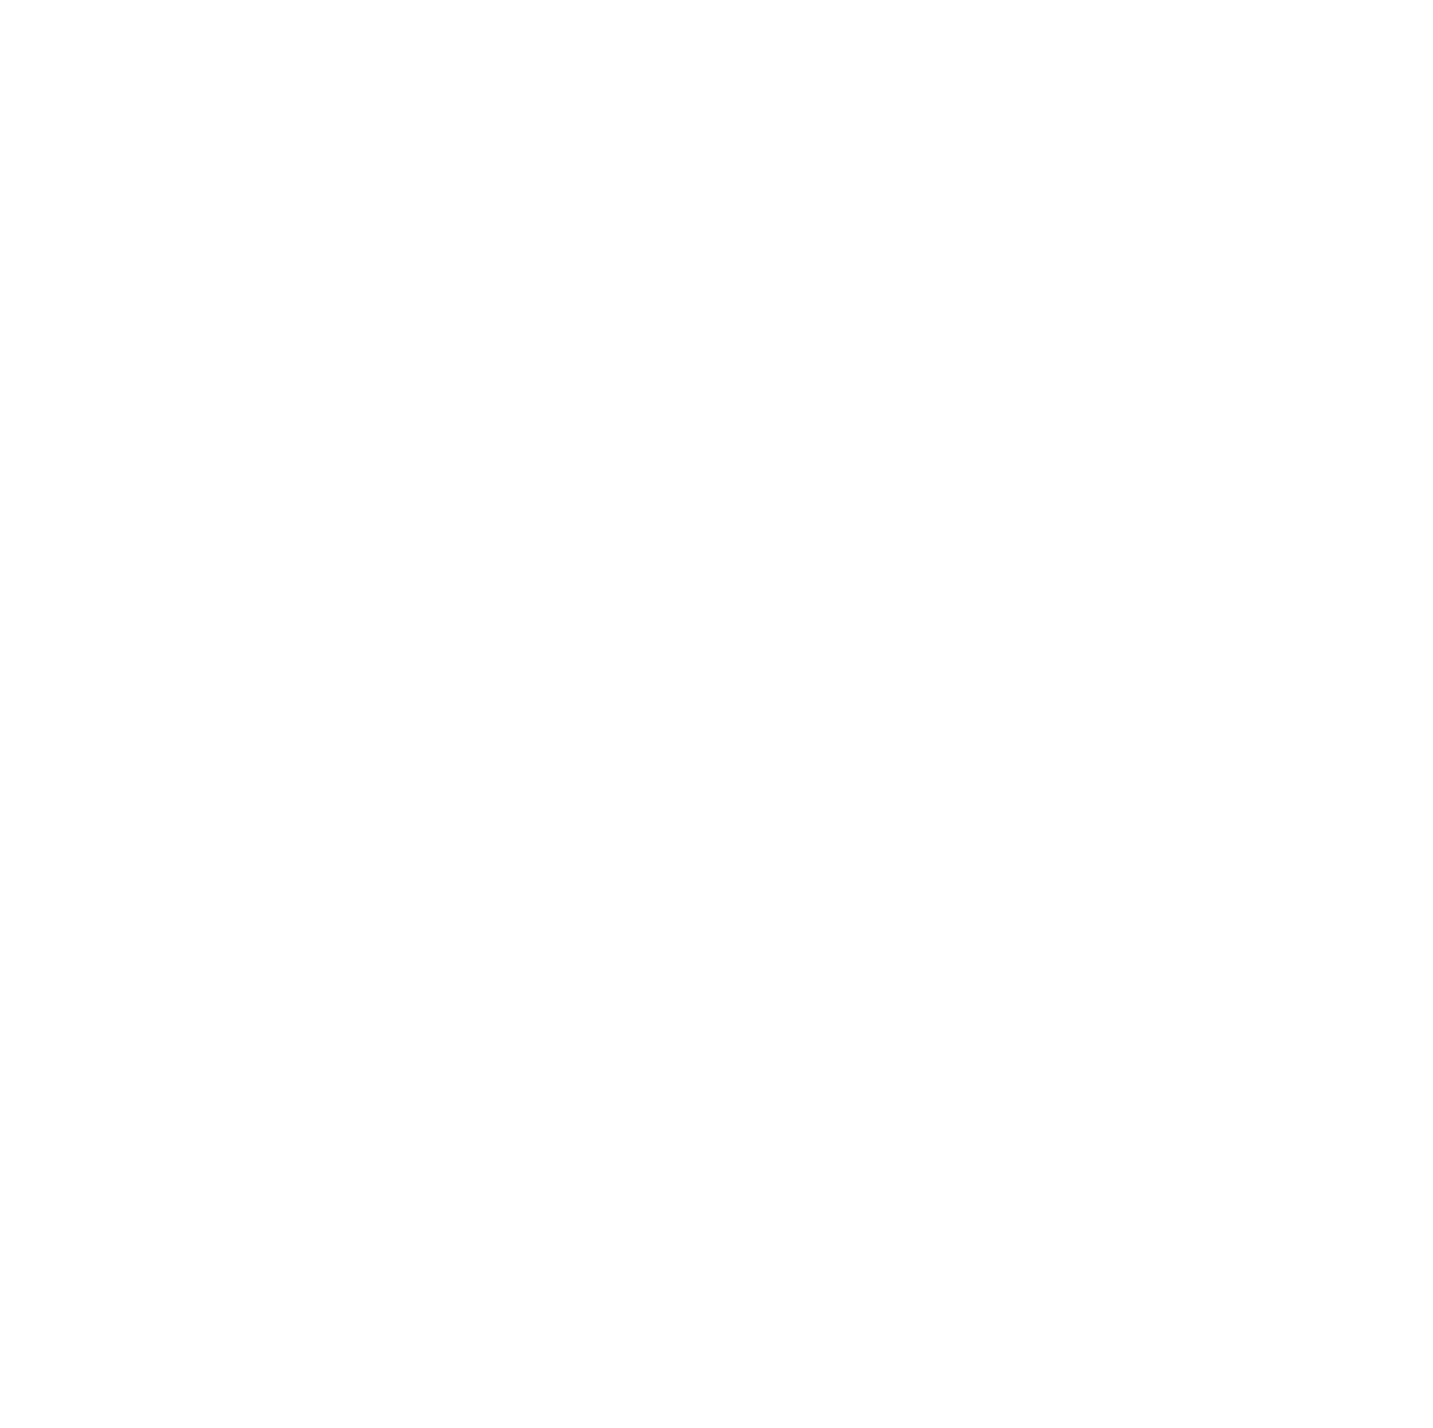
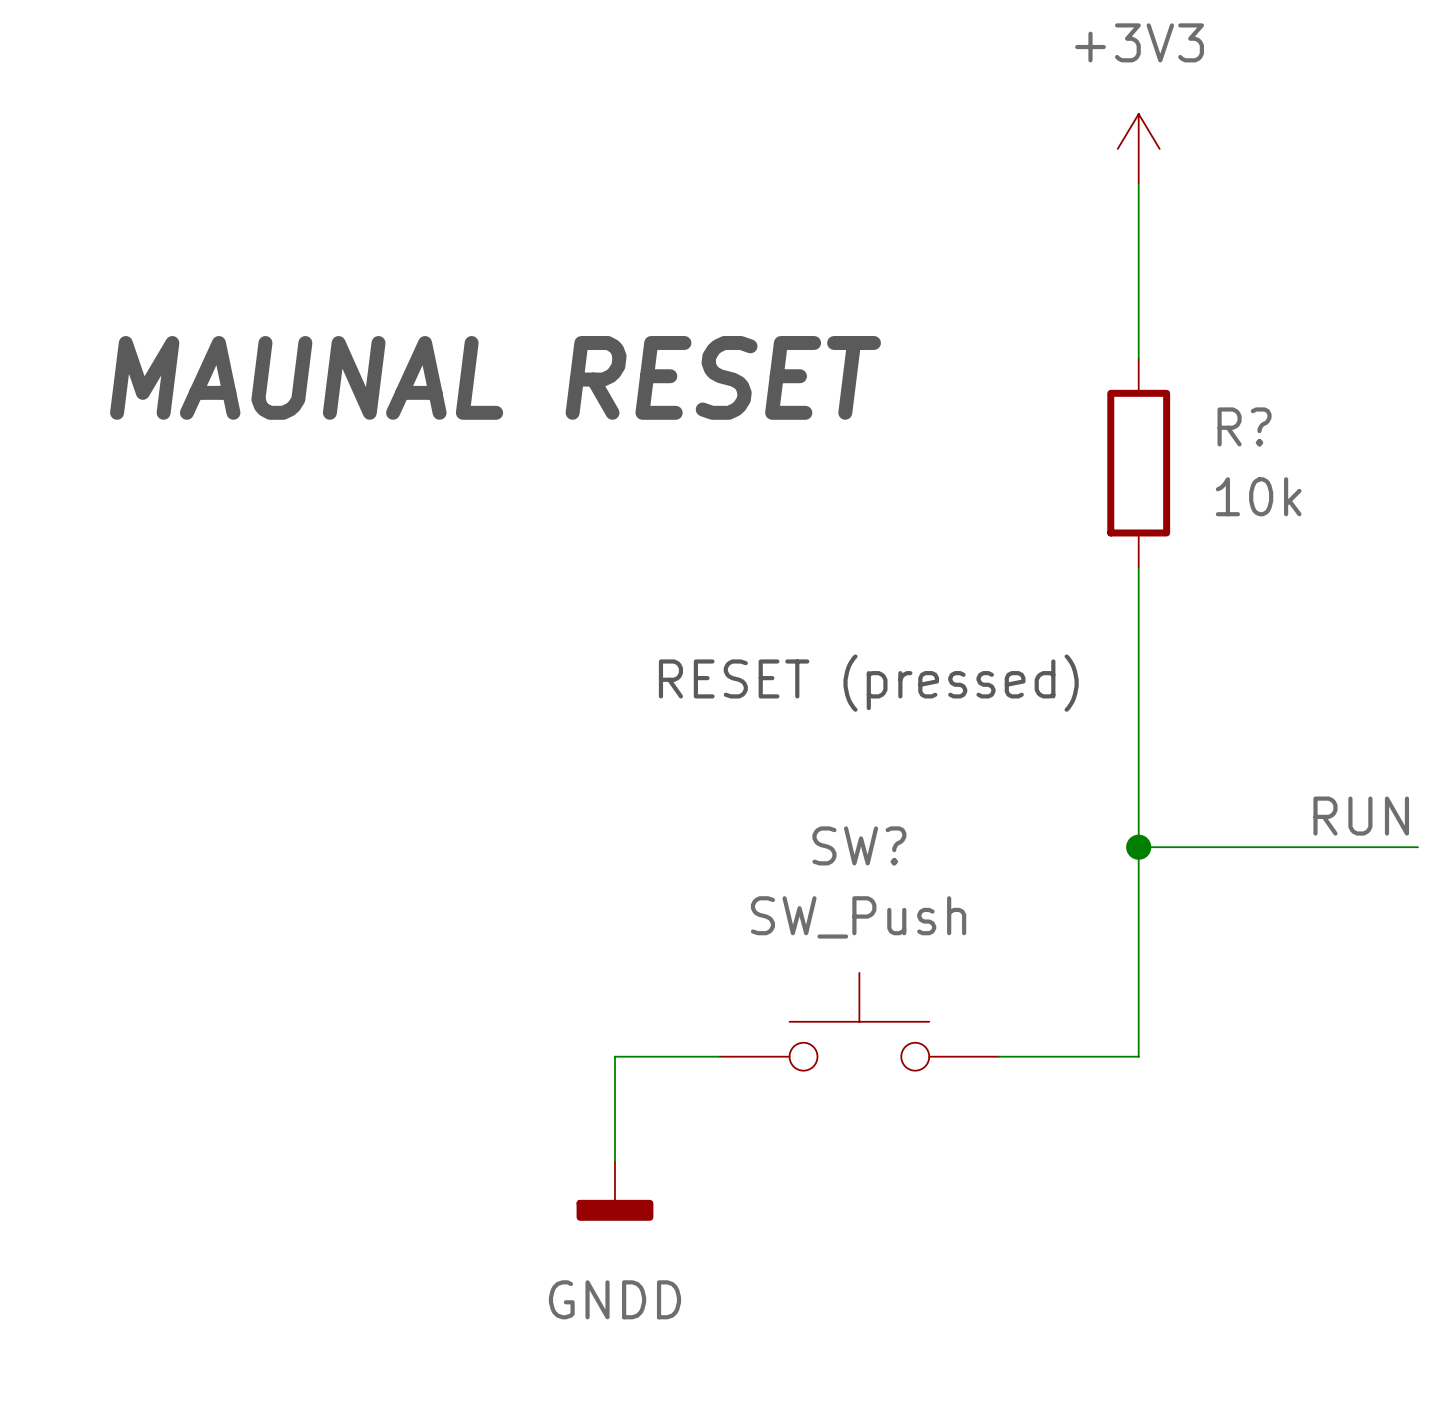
power symbol: none -> +3V3 (1138, 148)
wire: none -> (1138, 183) (1138, 358)
text: none -> MAUNAL RESET (495, 377)
R?: none -> 10k (1138, 463)
wire: none -> (1138, 567) (1138, 1056) (999, 1056)
text: none -> RESET (pressed) (868, 683)
label: none -> RUN (1361, 816)
wire: none -> (1138, 847) (1418, 847)
junction: none -> (1138, 847)
SW?: none -> SW_Push (859, 1021)
wire: none -> (719, 1056) (614, 1056) (614, 1161)
power symbol: none -> GNDD (614, 1191)

